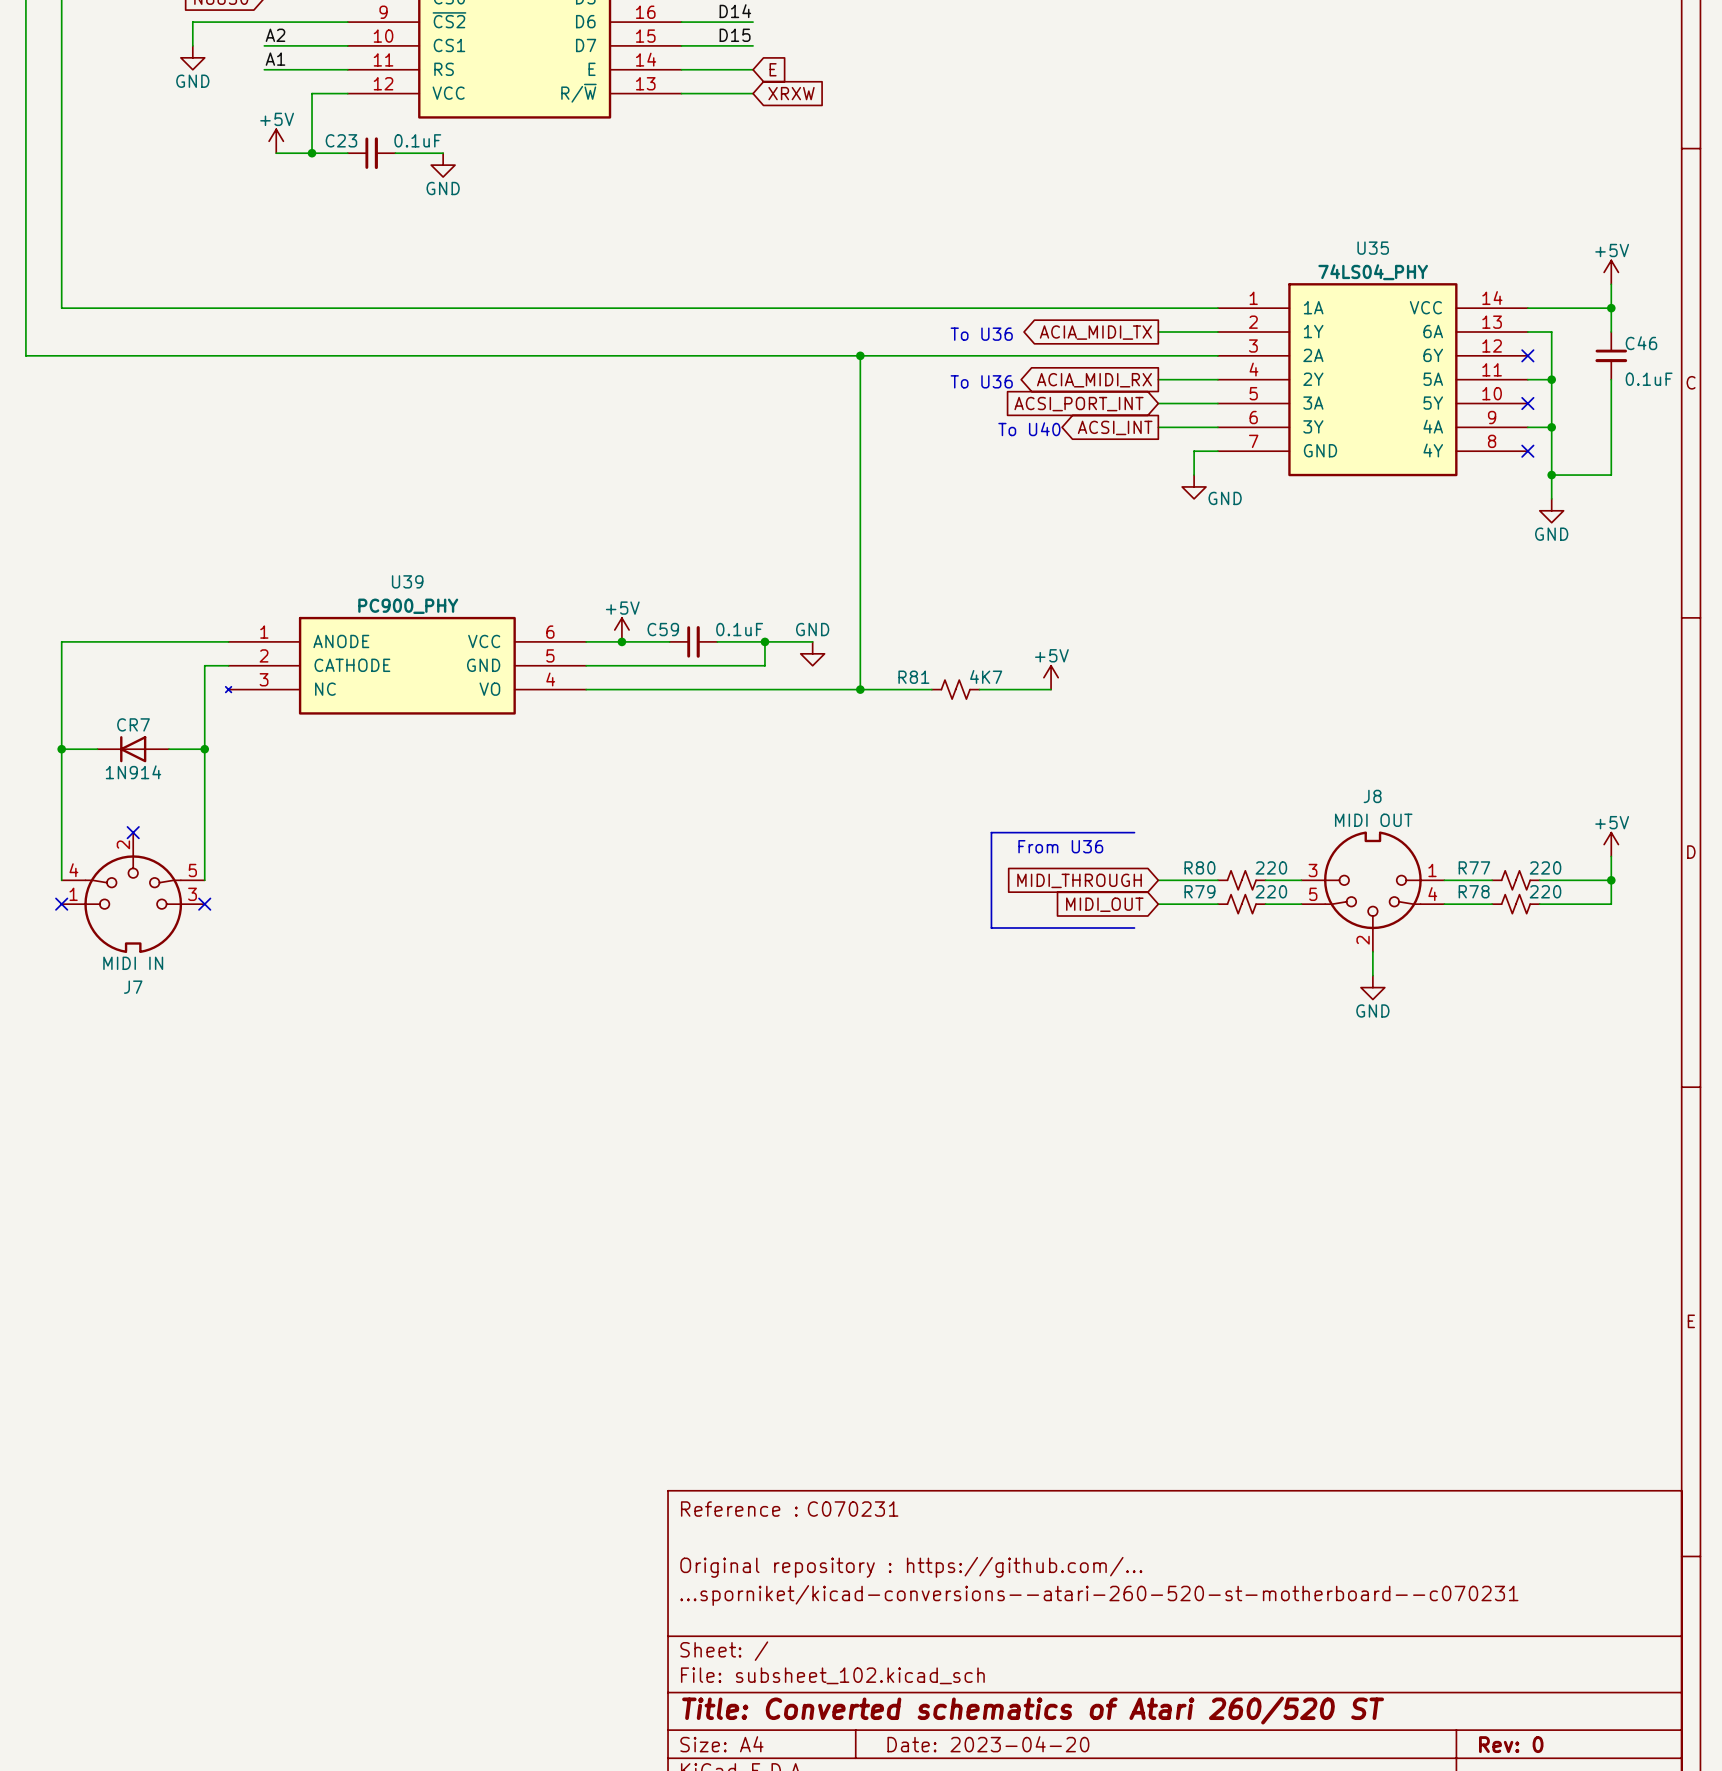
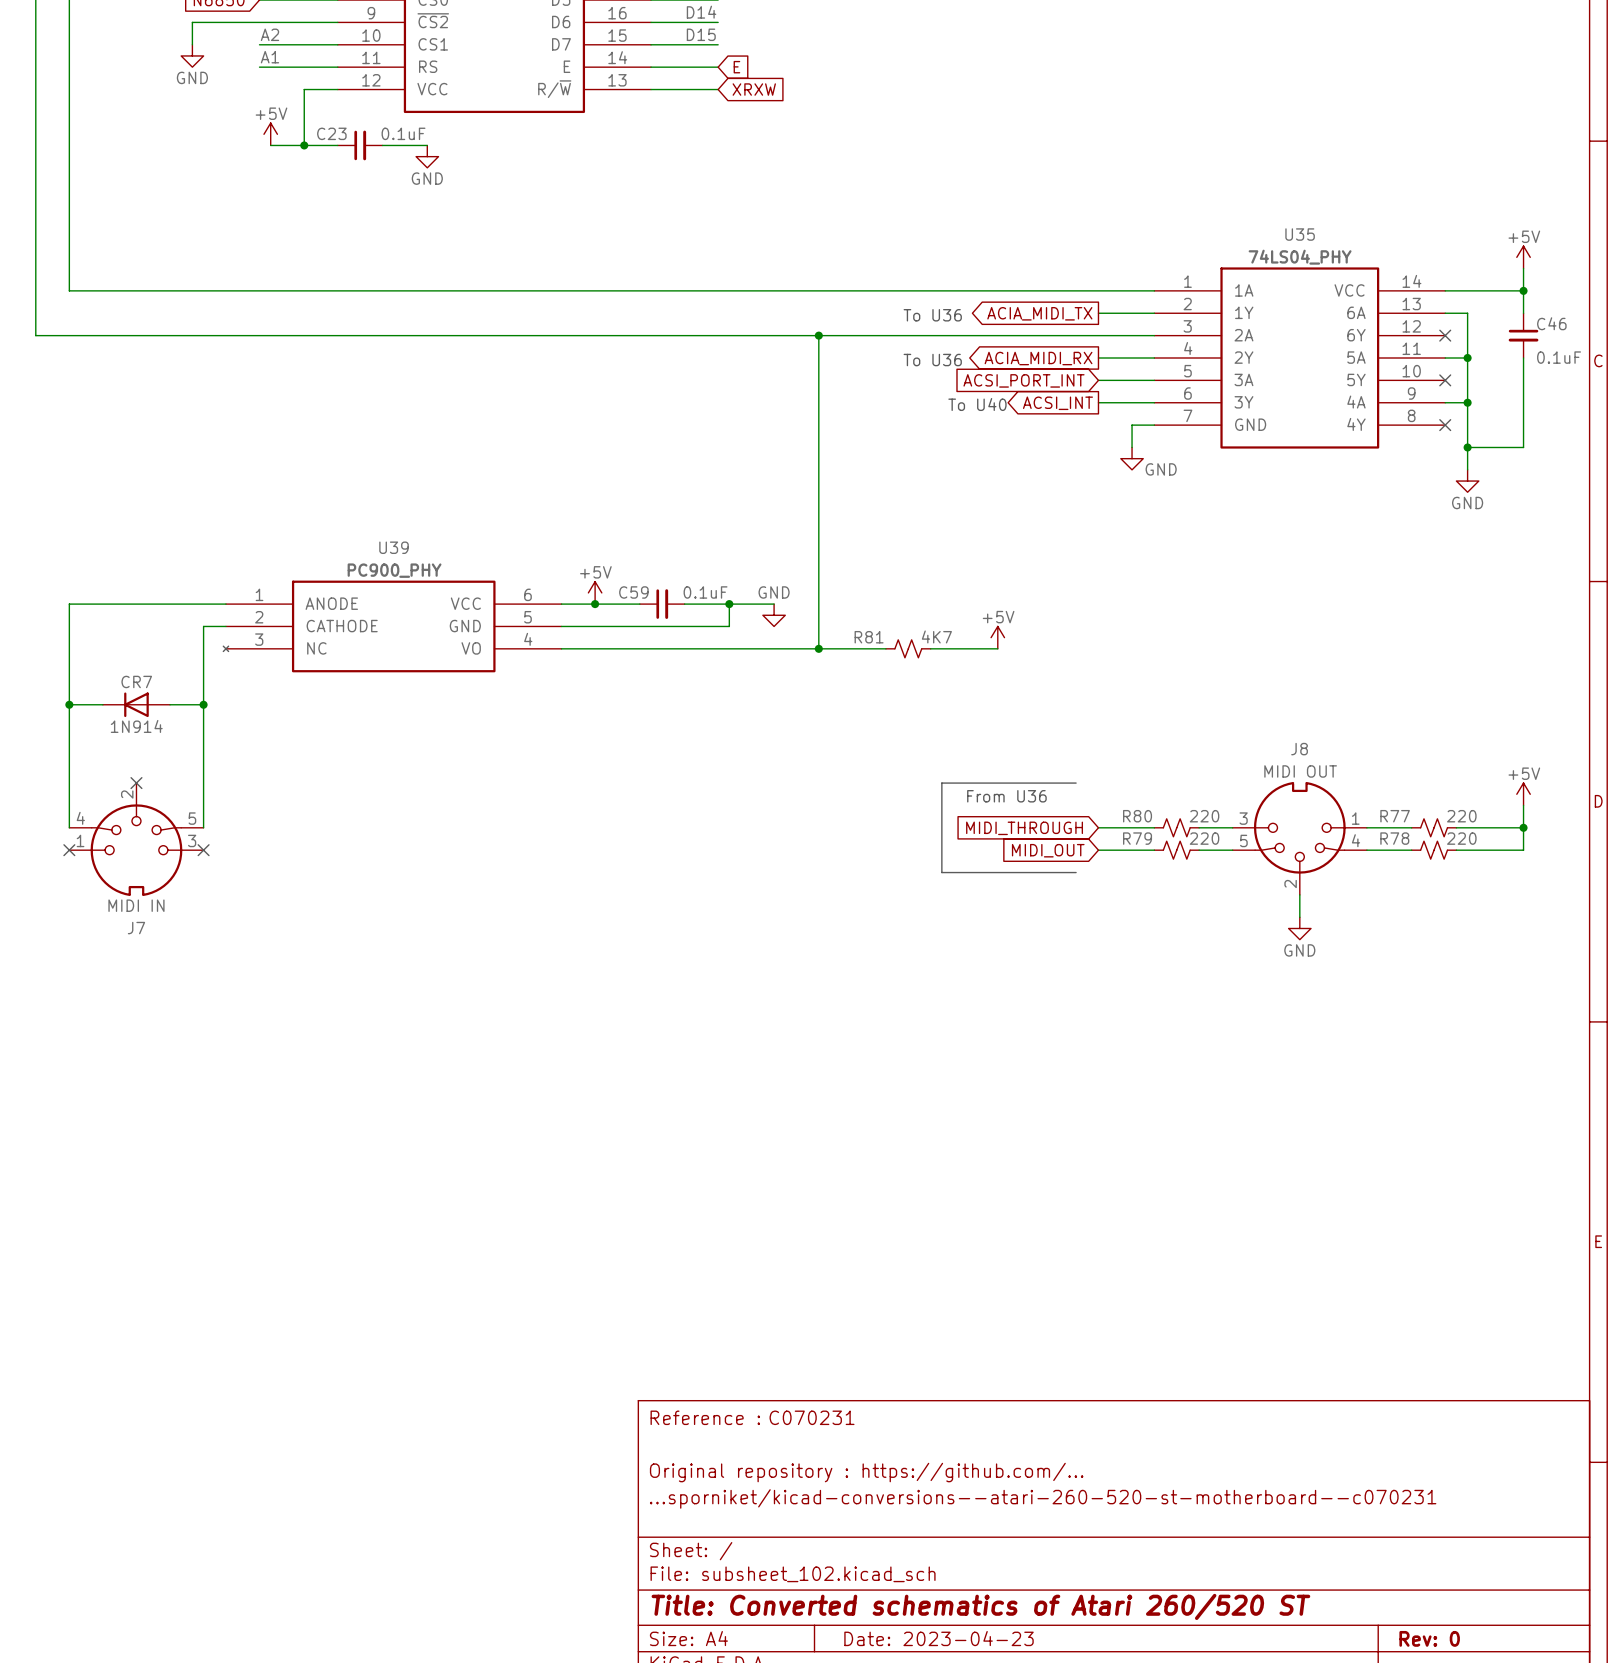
title block: Date: 2023-04-20 (988, 1744) -> Date: 2023-04-23 (939, 1638)

